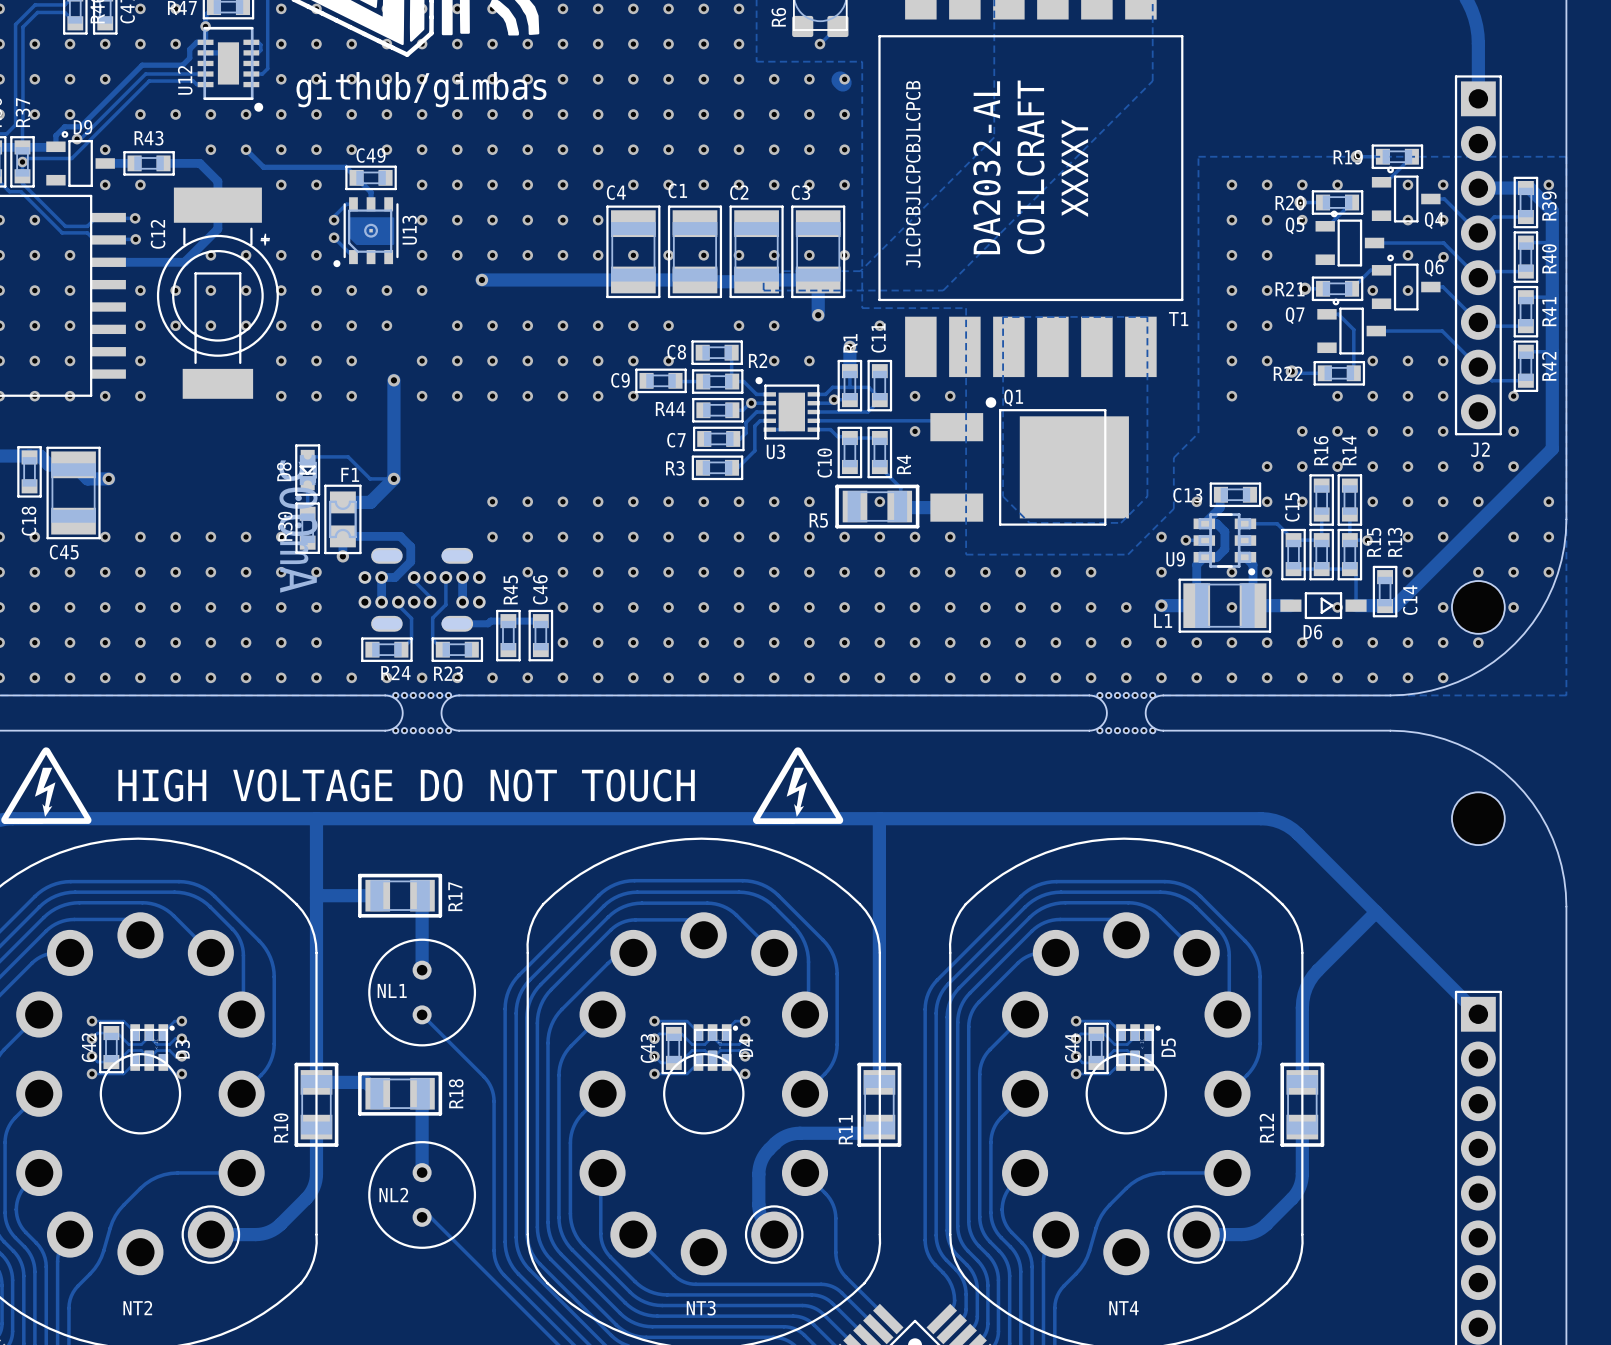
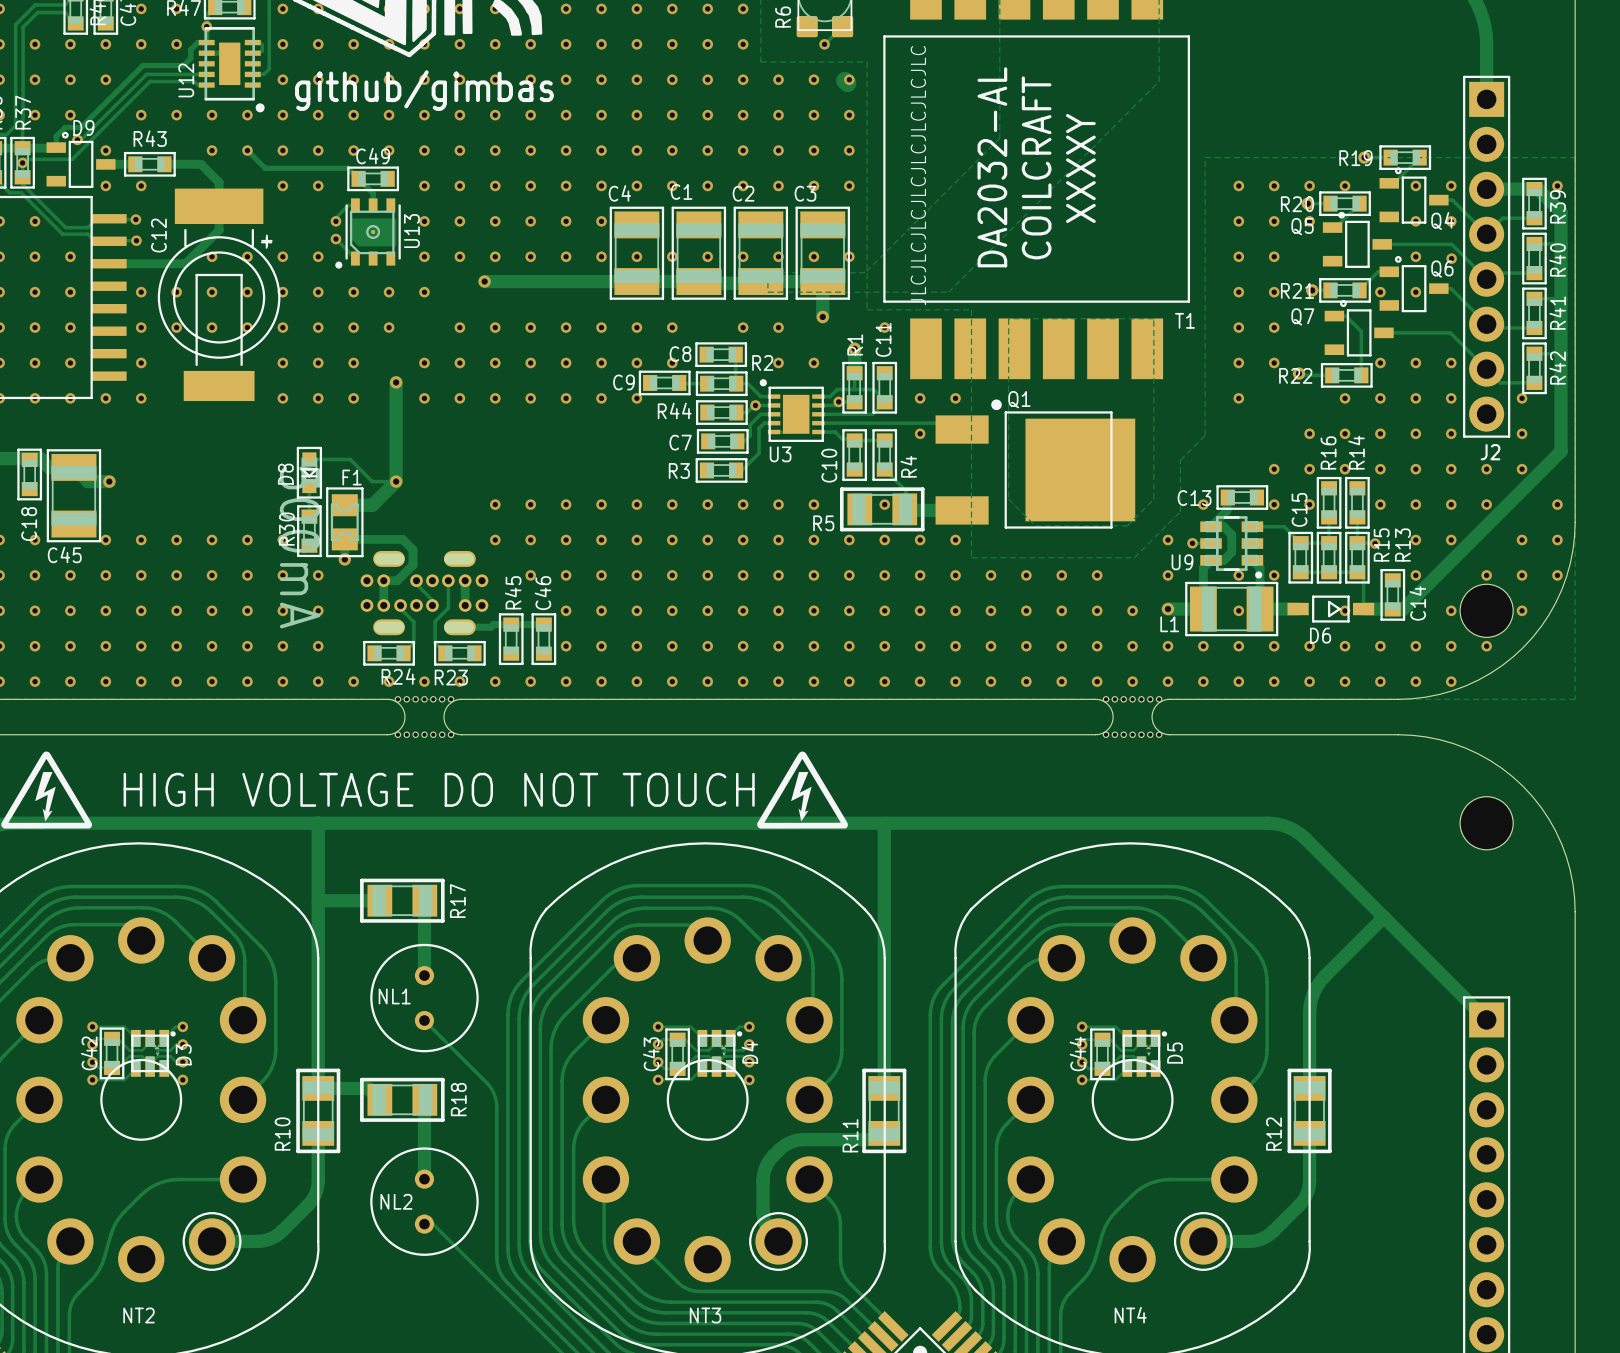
text: JLCPCBJLCPCBJLCPCB (913, 174) -> JLCJLCJLCJLCJLCJLCJLCJLC (918, 175)

